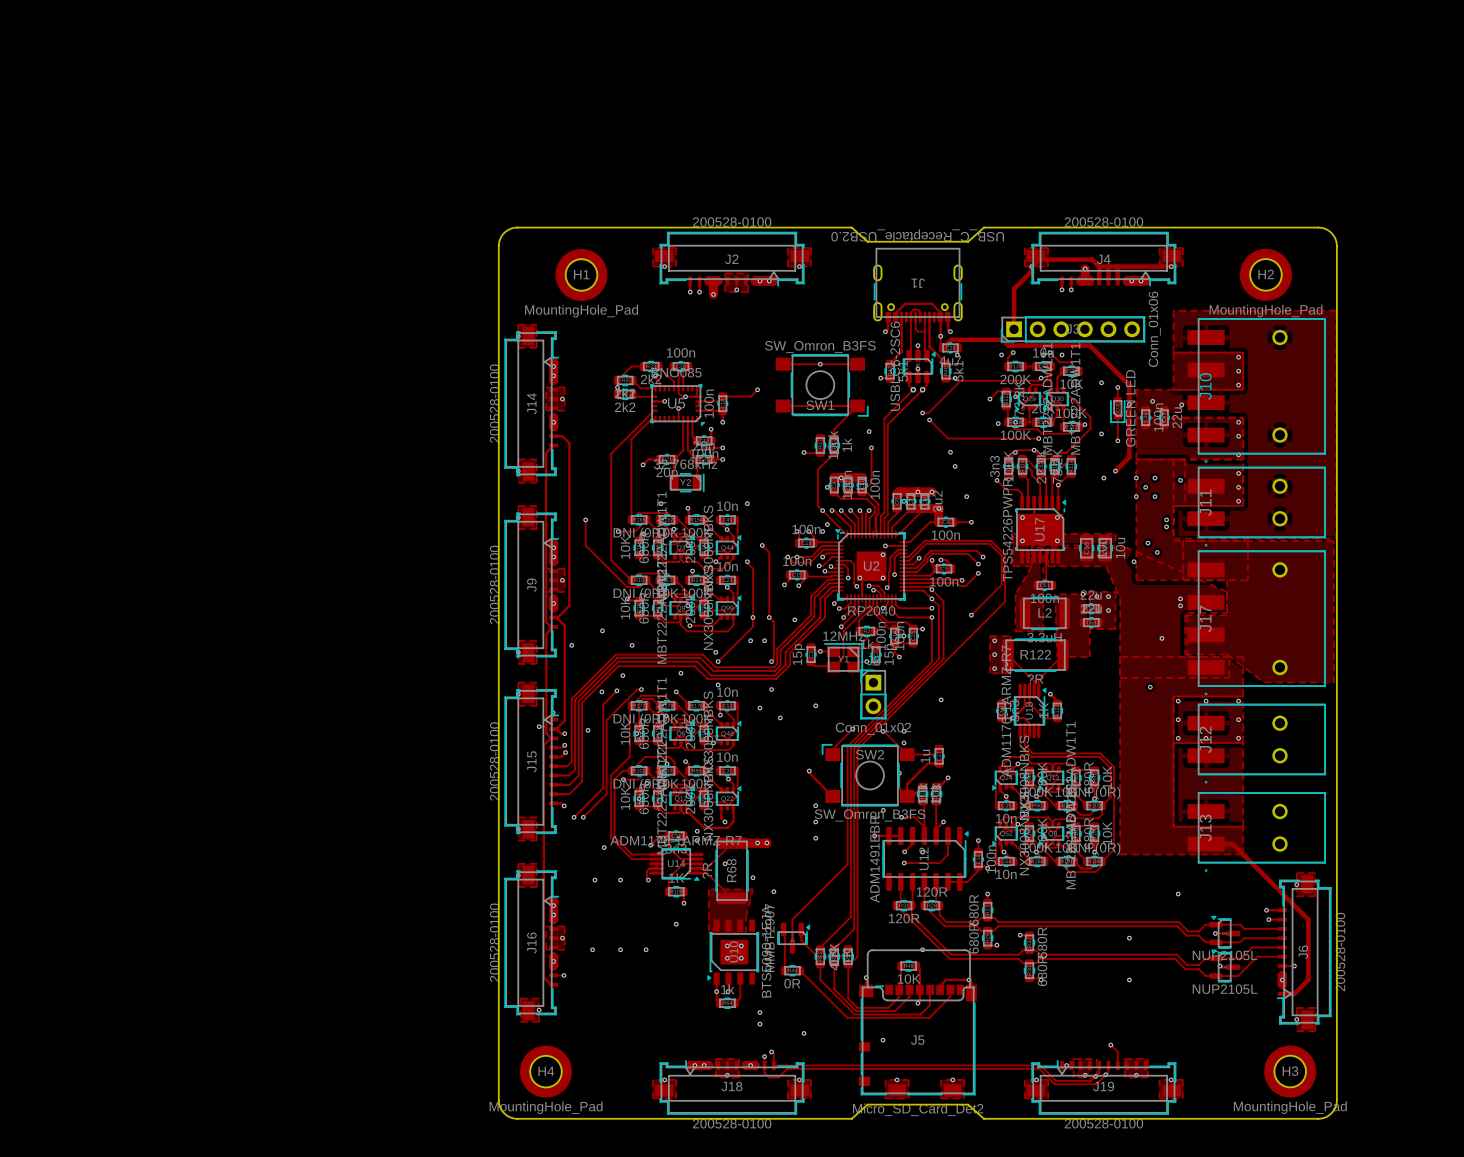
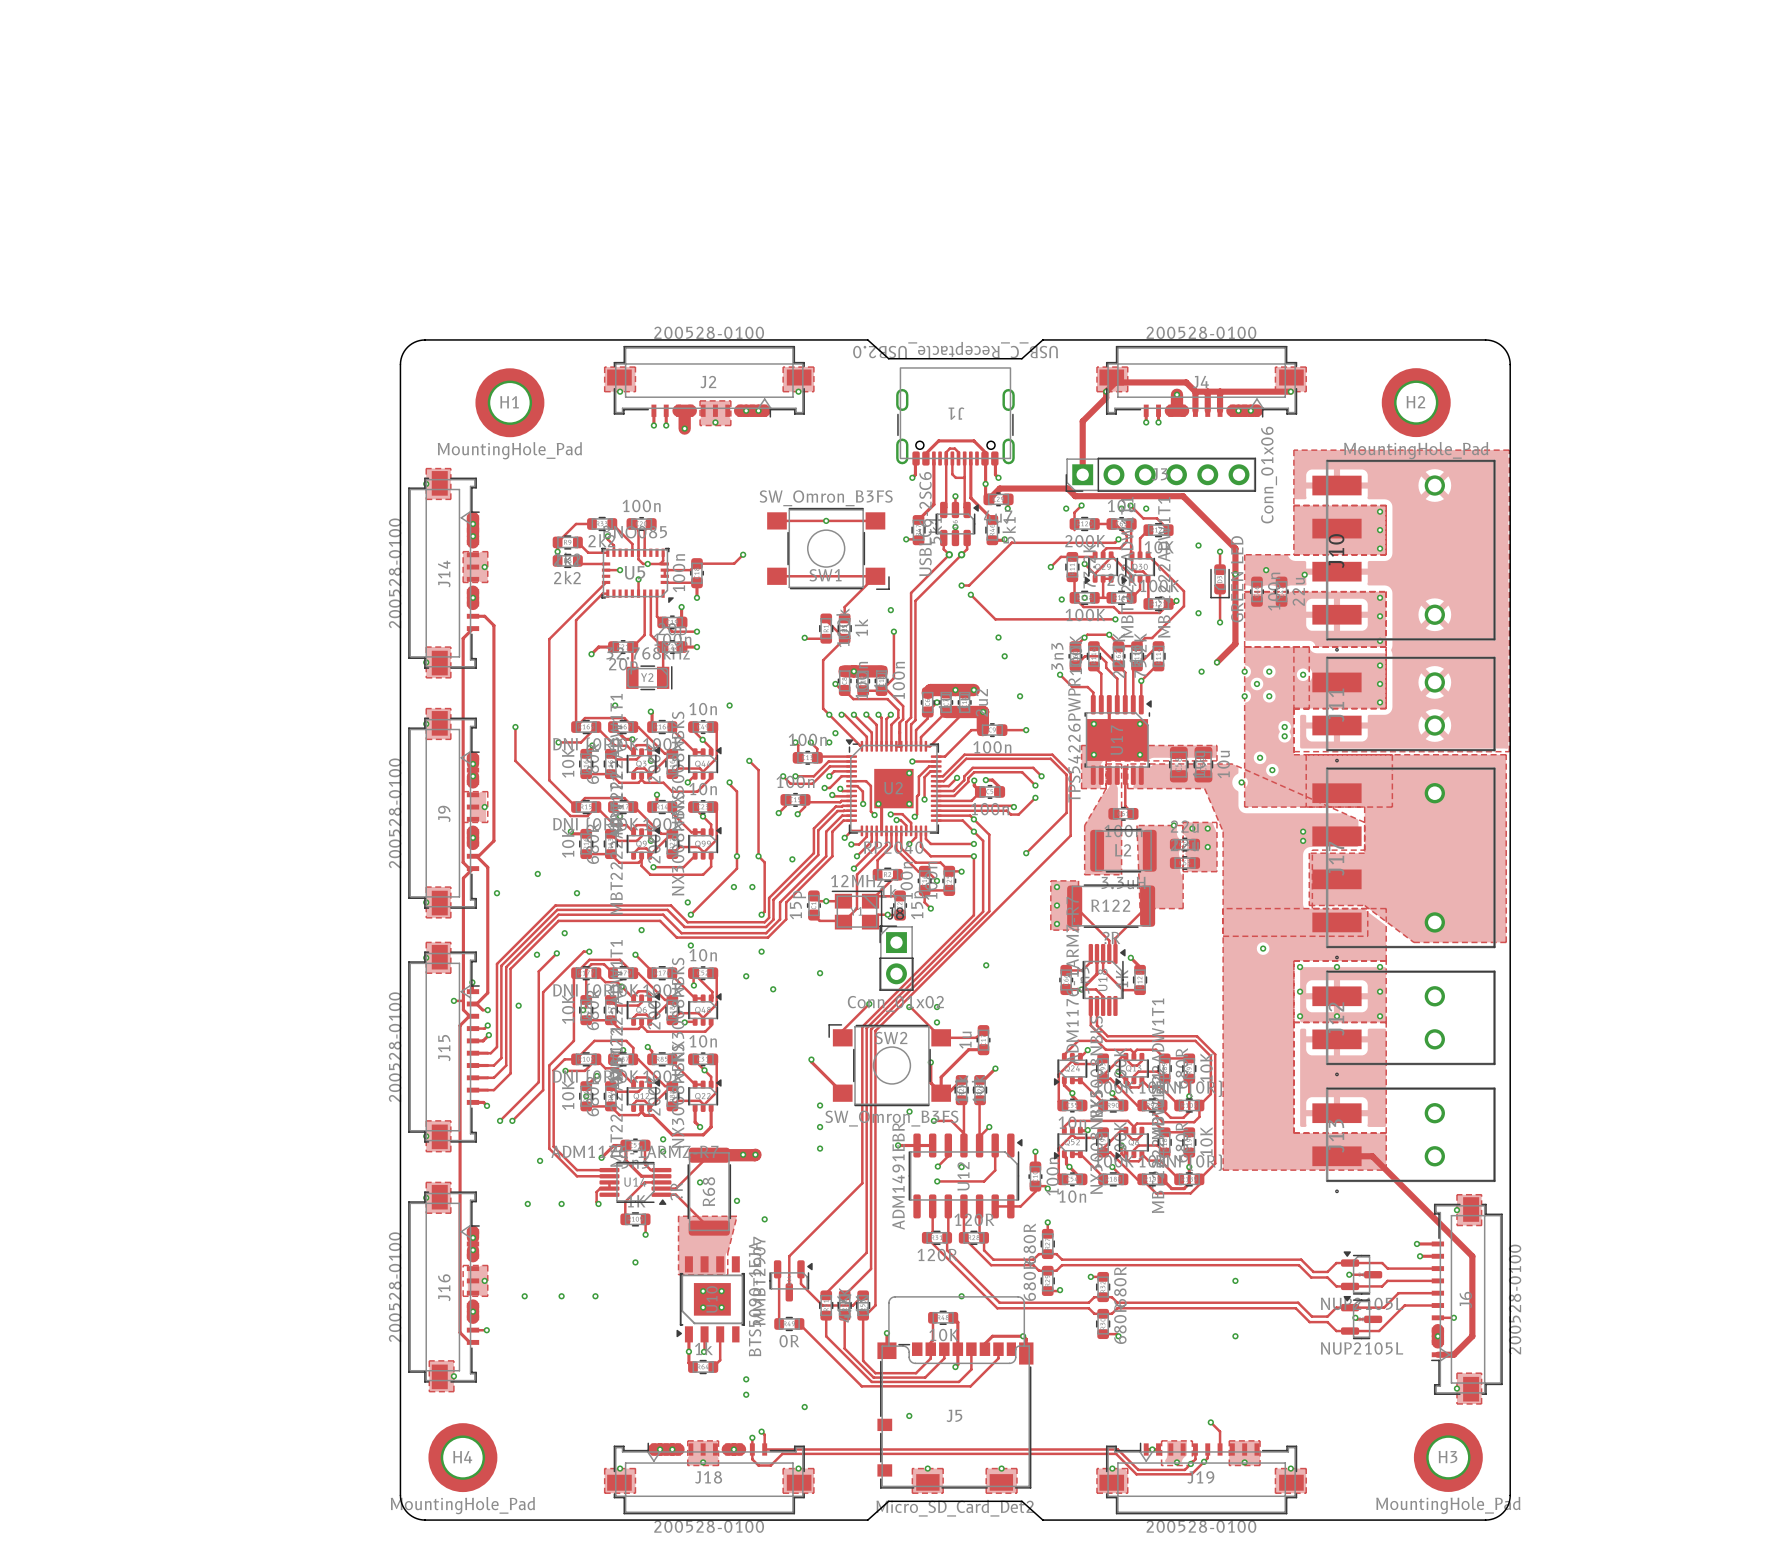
via: (1161, 638) -> none
via: (1178, 894) -> none

